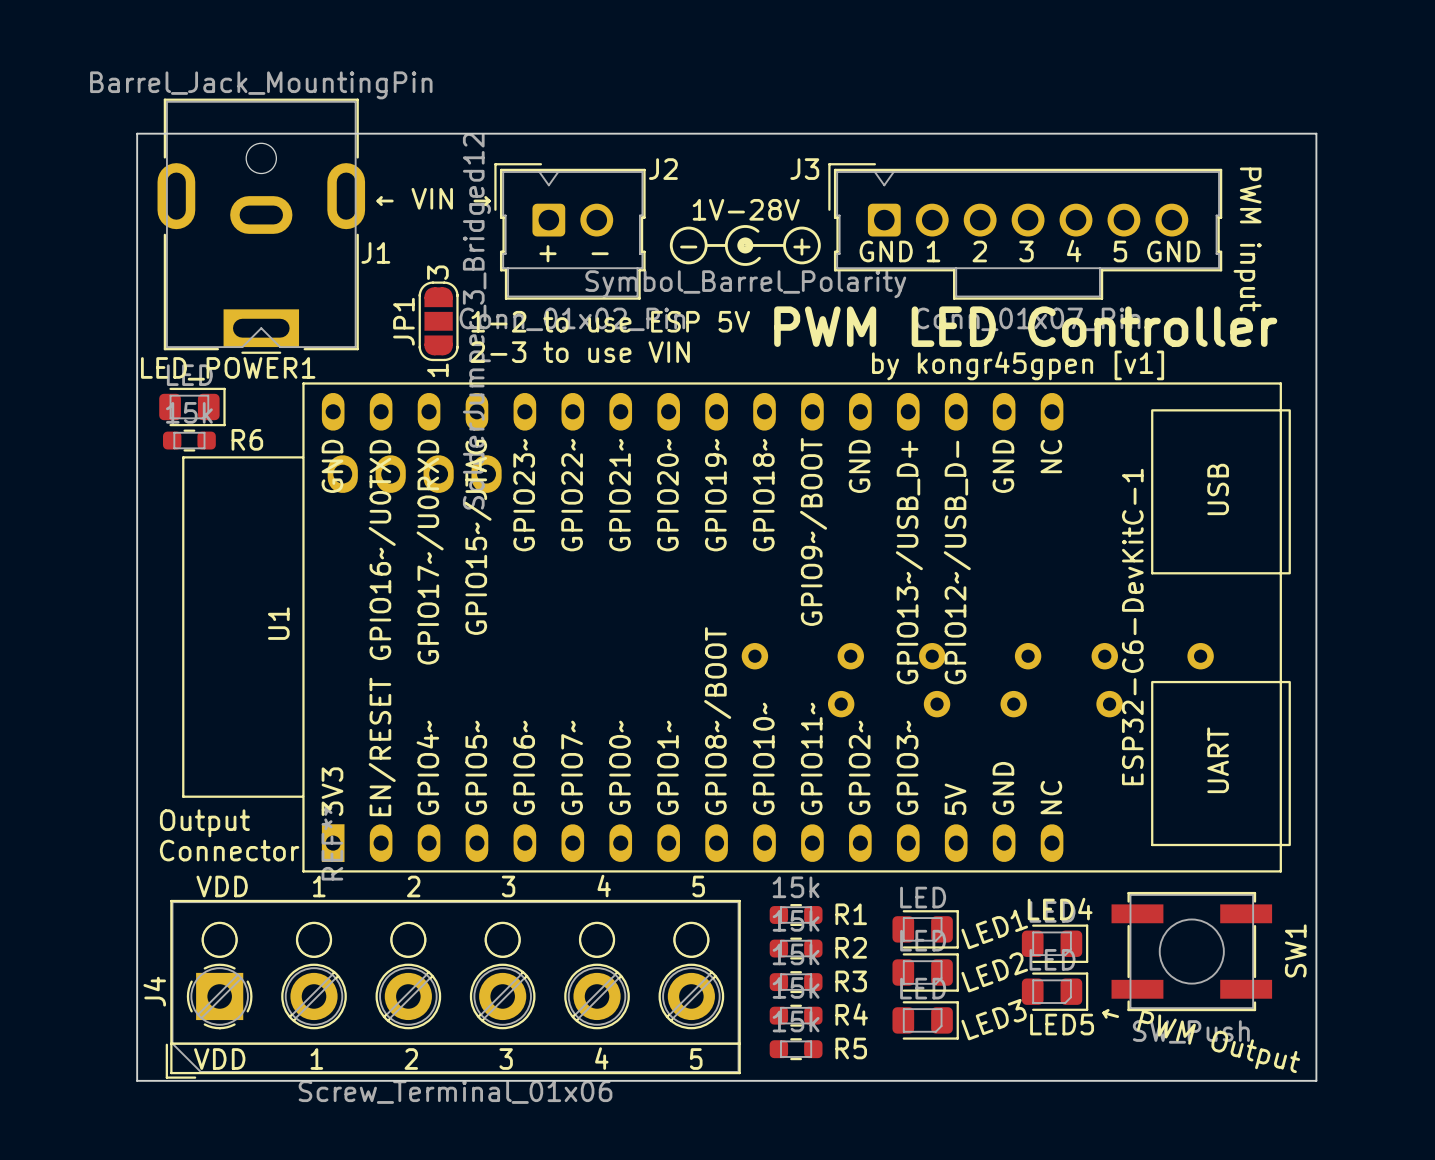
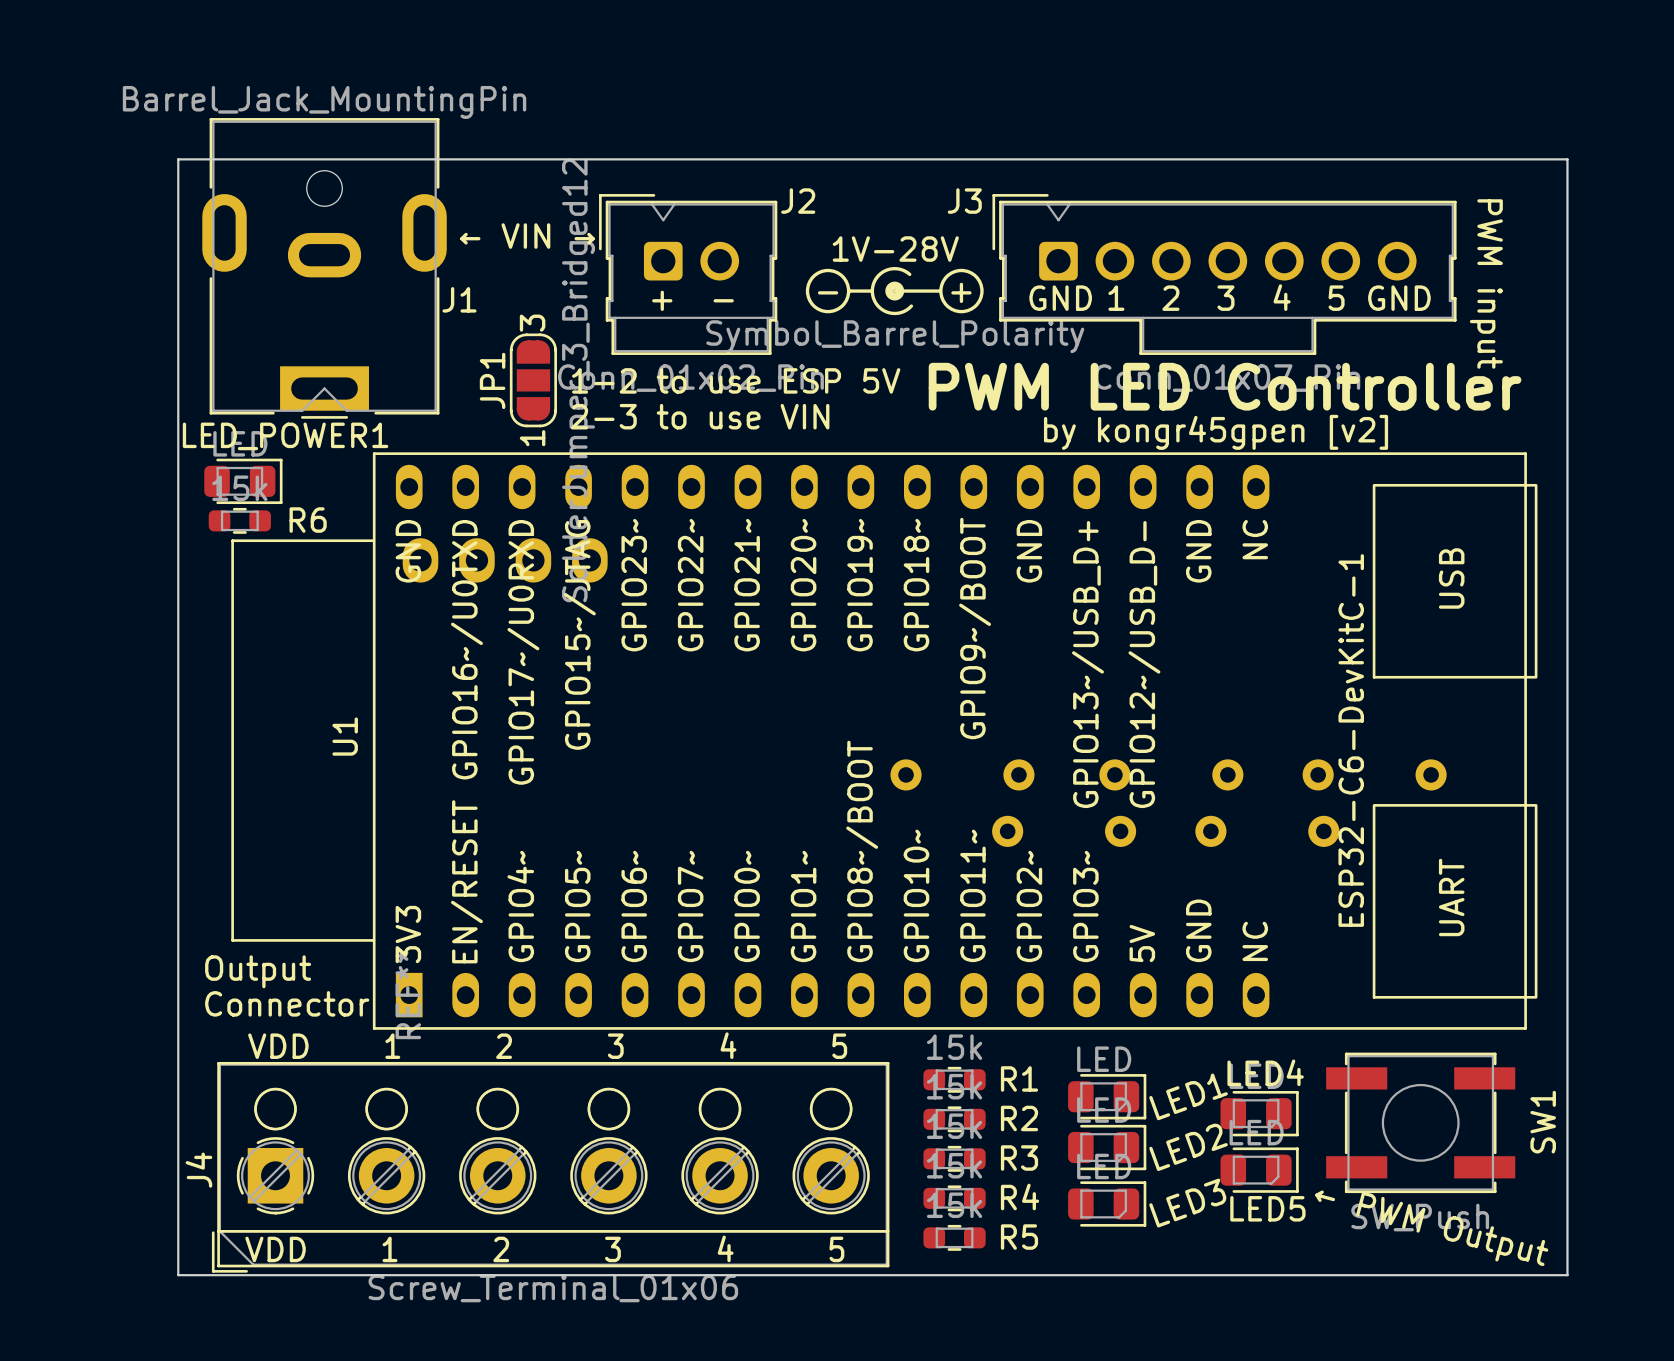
text: by kongr45gpen [v1] (1018, 365) -> by kongr45gpen [v2] (1216, 432)

